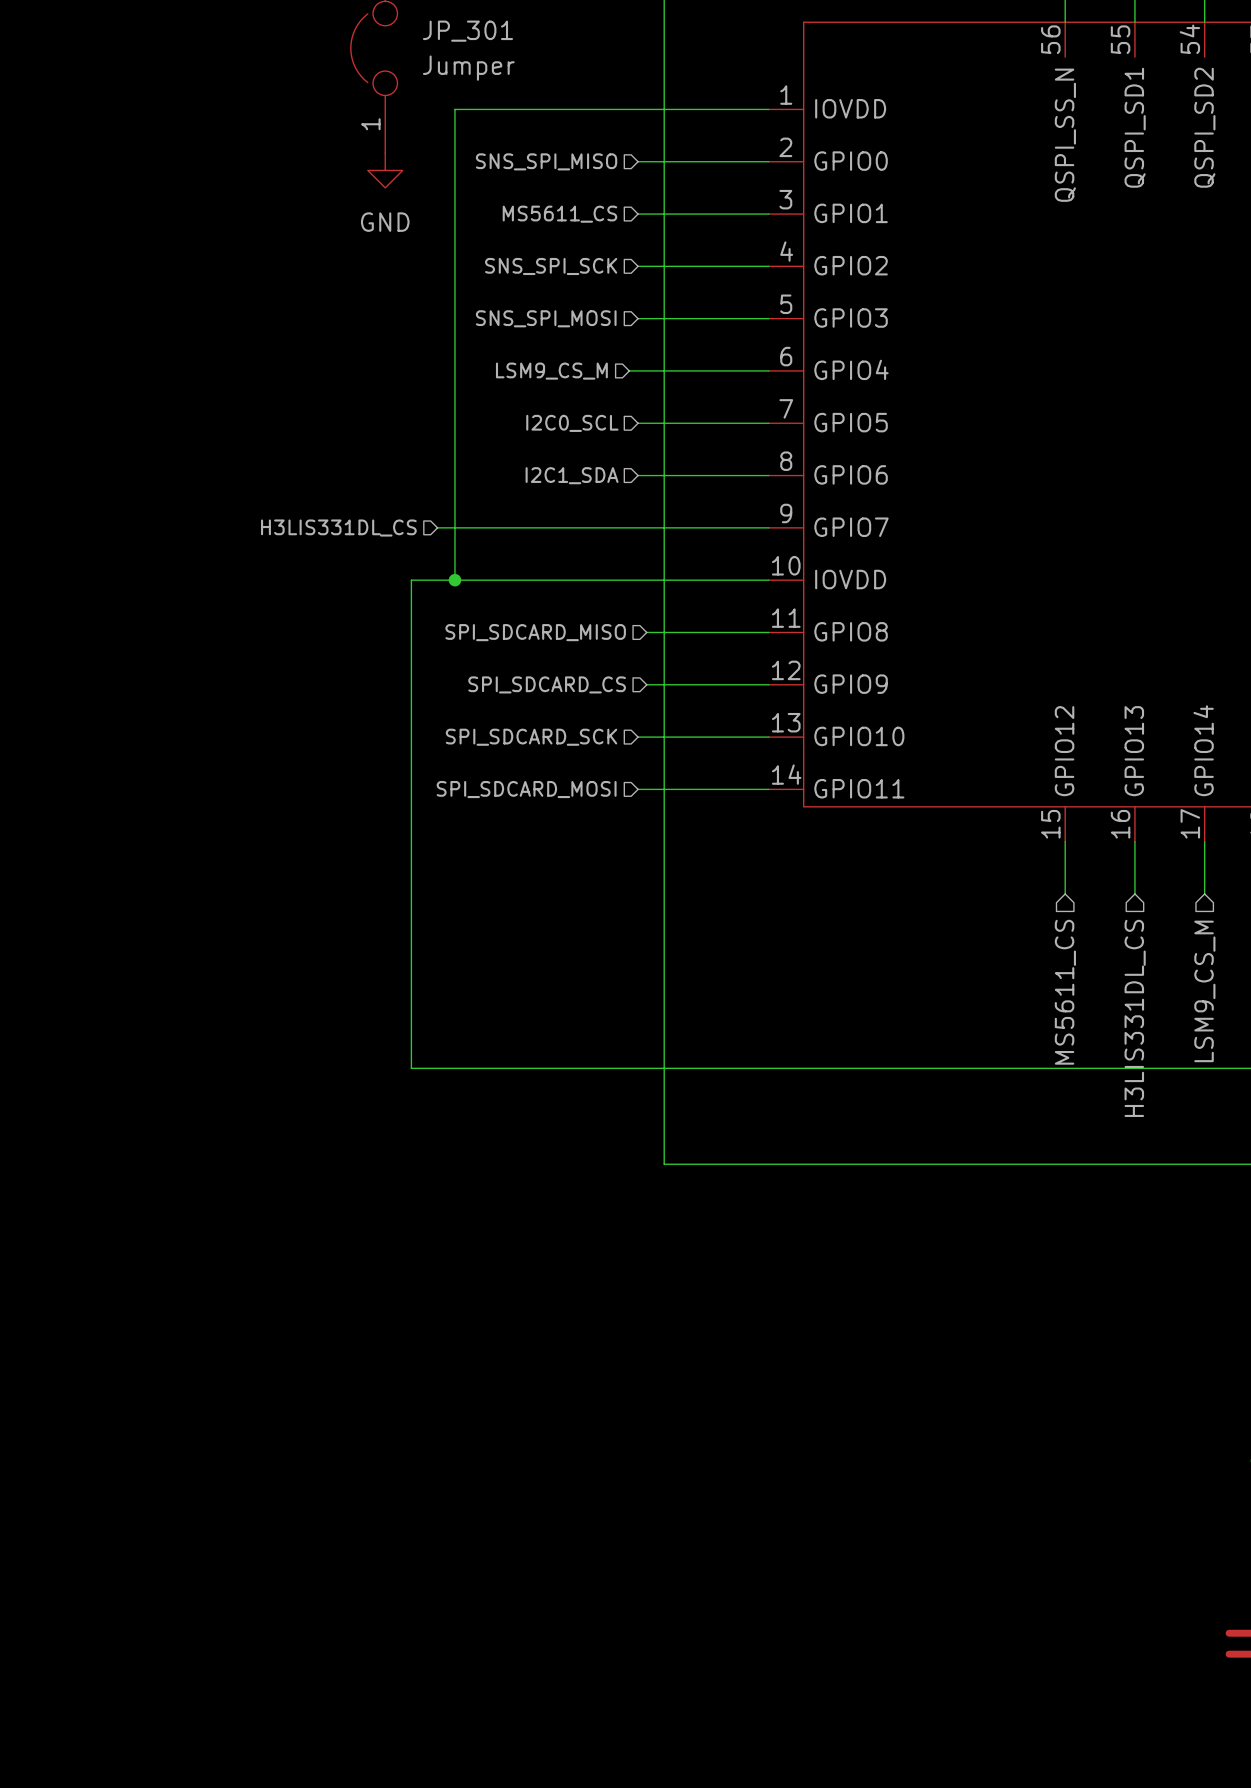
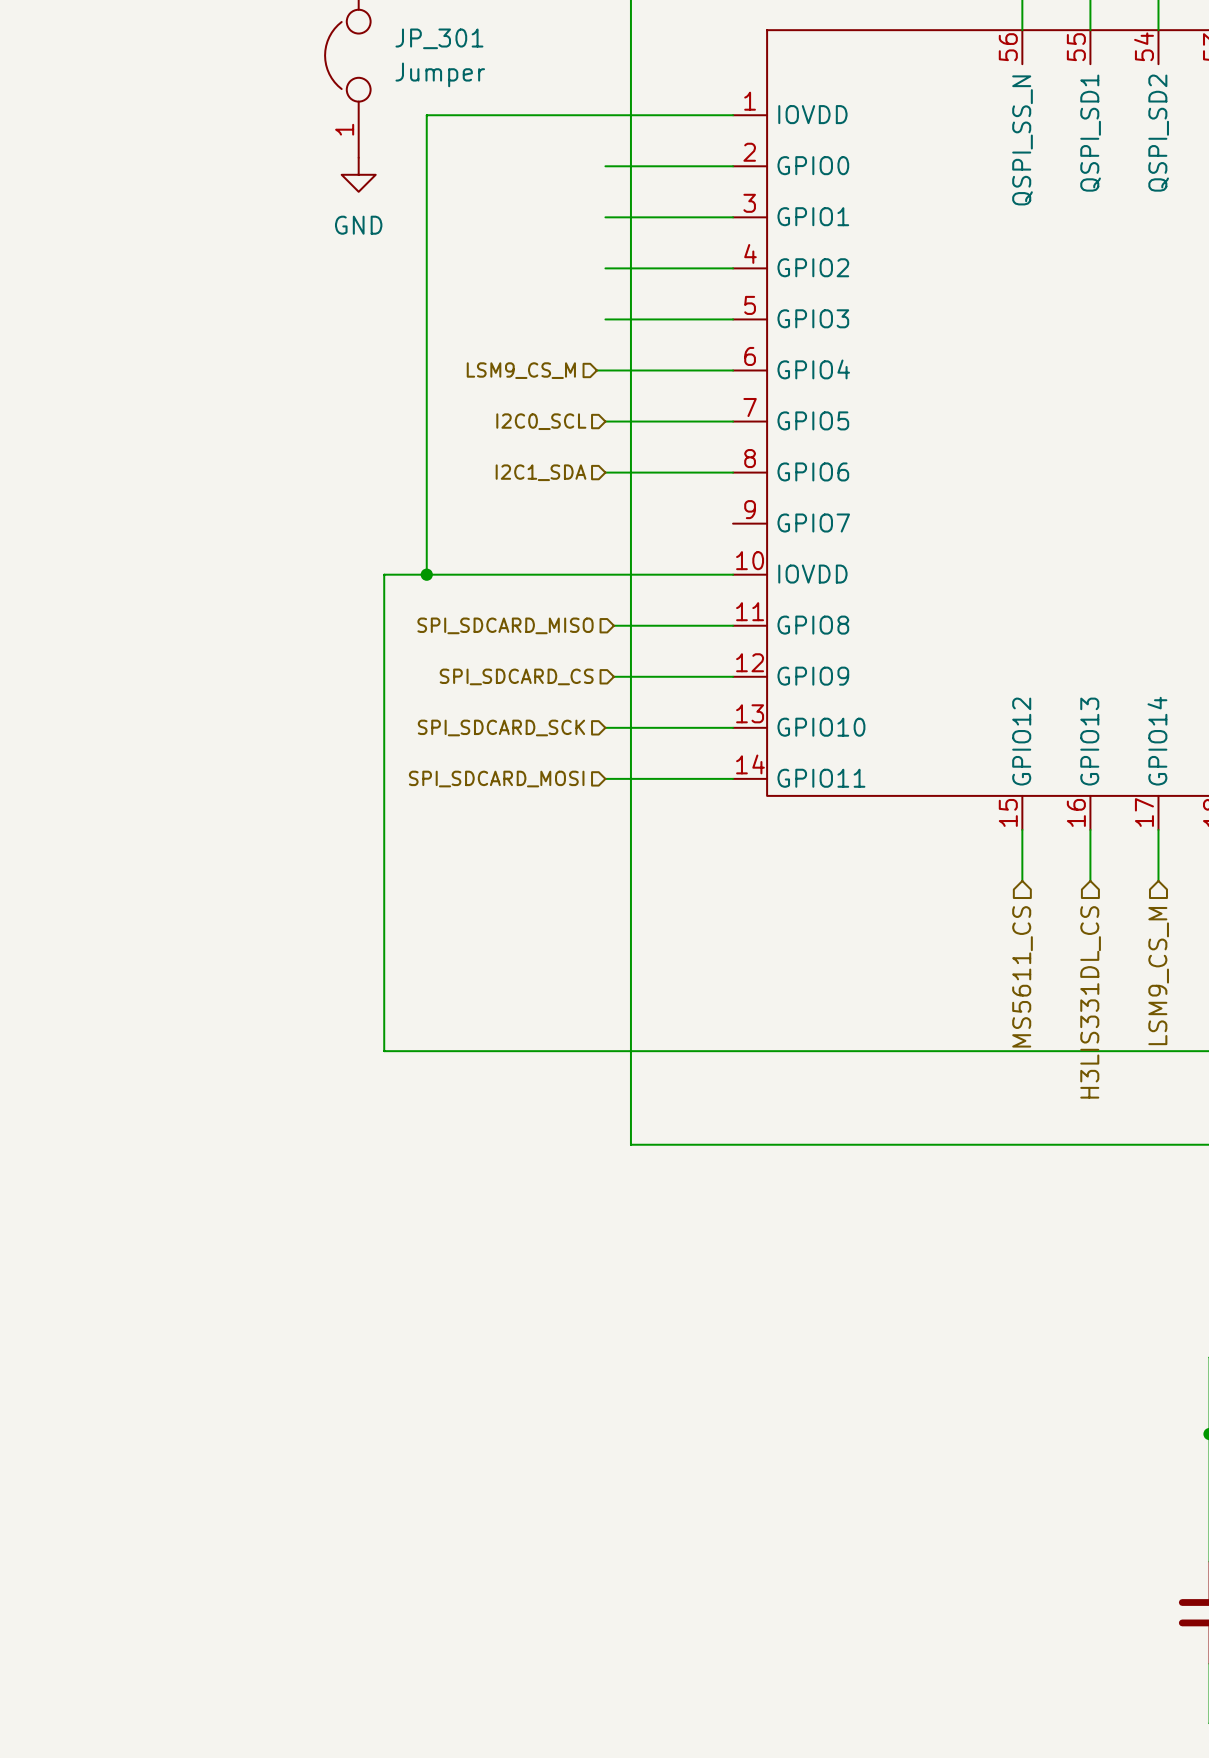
hierarchical label: SNS_SPI_MISO (546, 161) -> none
hierarchical label: MS5611_CS (559, 214) -> none
hierarchical label: SNS_SPI_SCK (551, 266) -> none
hierarchical label: SNS_SPI_MOSI (546, 318) -> none
wire: (437, 527) (768, 527) -> none
hierarchical label: H3LIS331DL_CS (338, 528) -> none

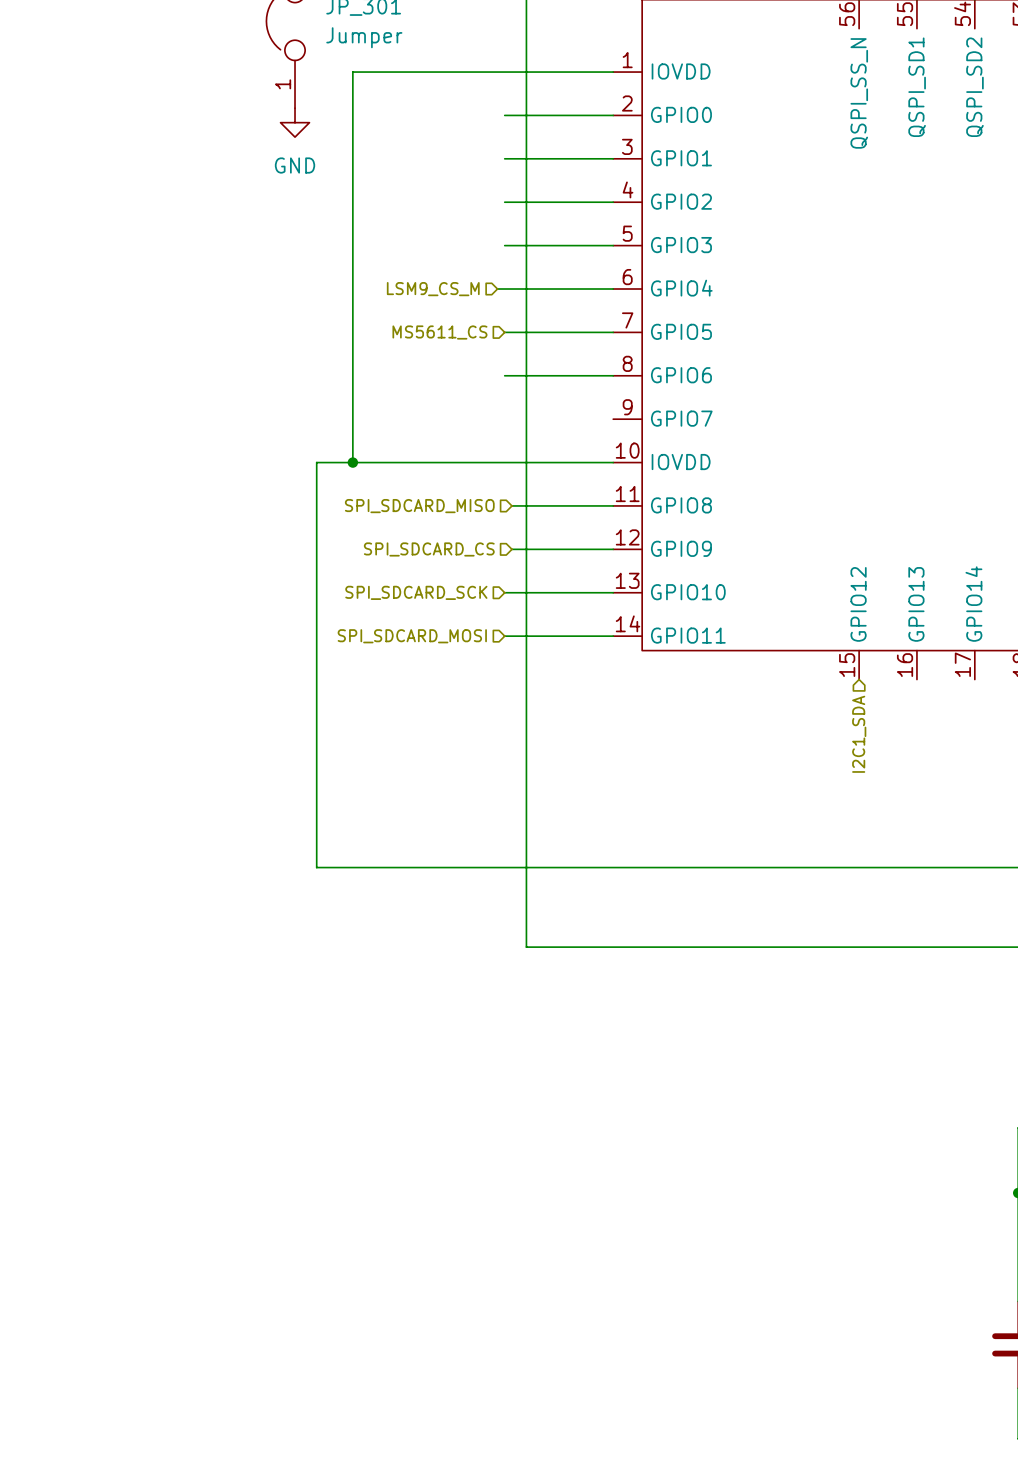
hierarchical label: I2C0_SCL (541, 421) -> MS5611_CS (439, 332)
hierarchical label: I2C1_SDA (541, 472) -> none
wire: (1022, 829) (1022, 880) -> none
wire: (1090, 829) (1090, 880) -> none
wire: (1158, 829) (1158, 880) -> none
hierarchical label: none -> I2C1_SDA (859, 734)
hierarchical label: MS5611_CS (1022, 976) -> none
hierarchical label: LSM9_CS_M (1158, 976) -> none
hierarchical label: H3LIS331DL_CS (1090, 1002) -> none

